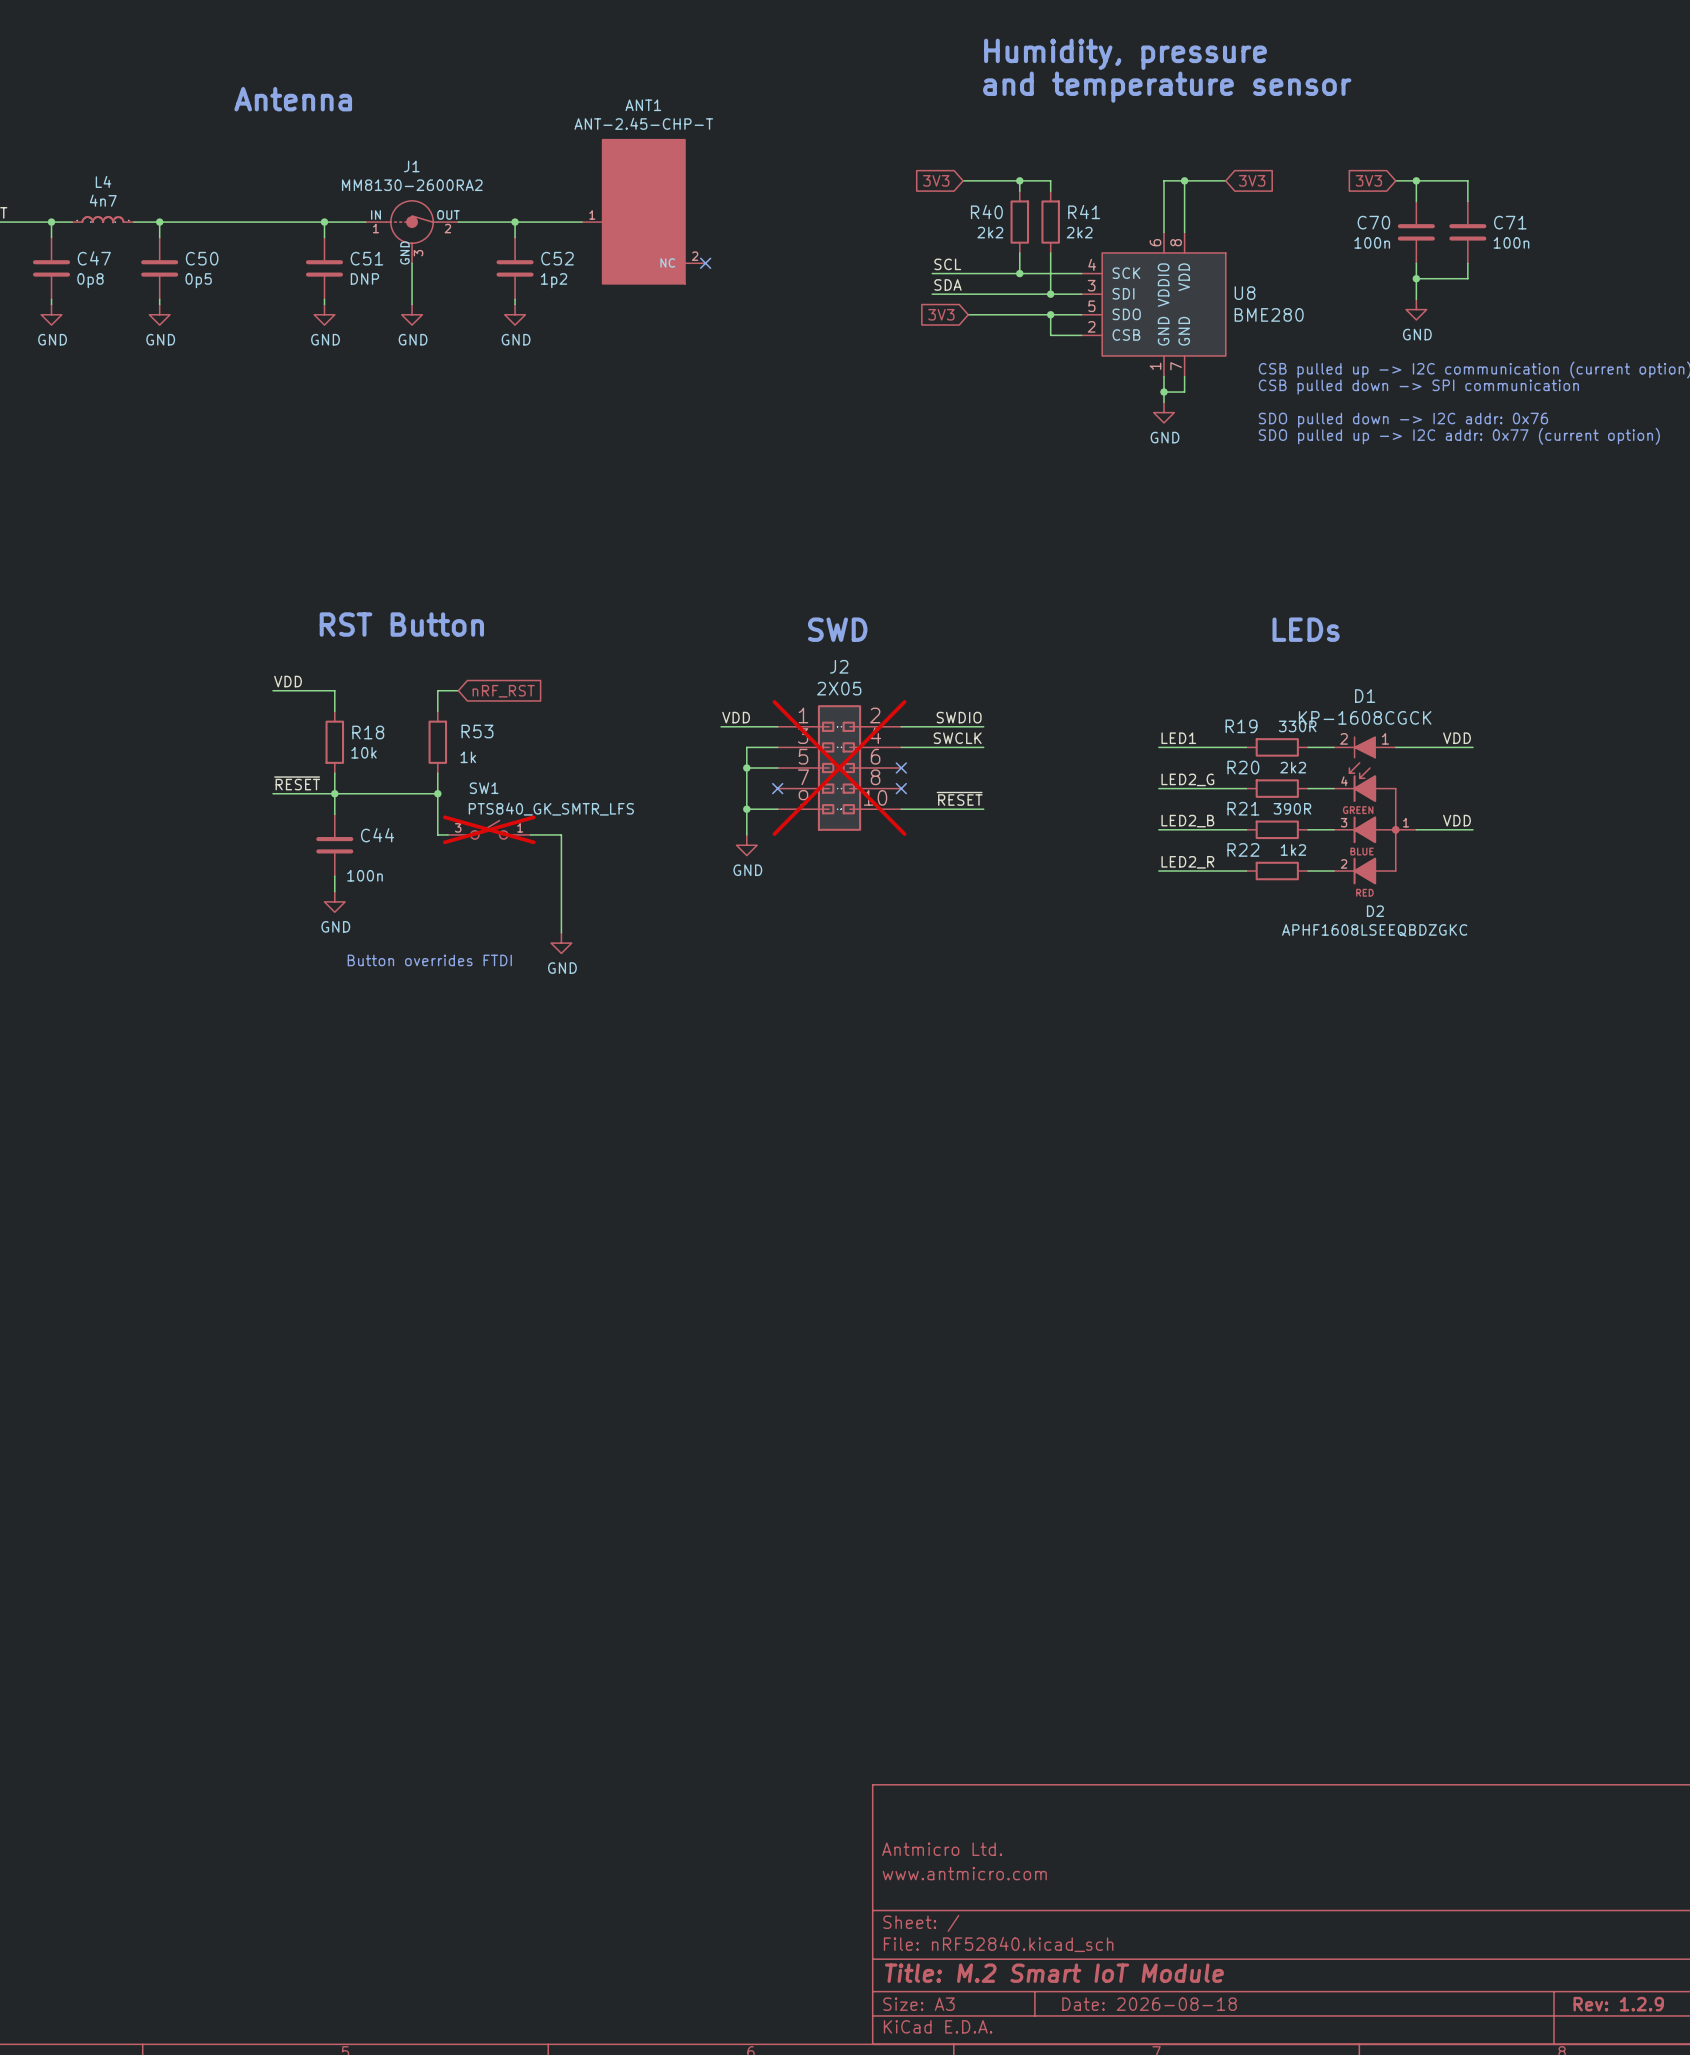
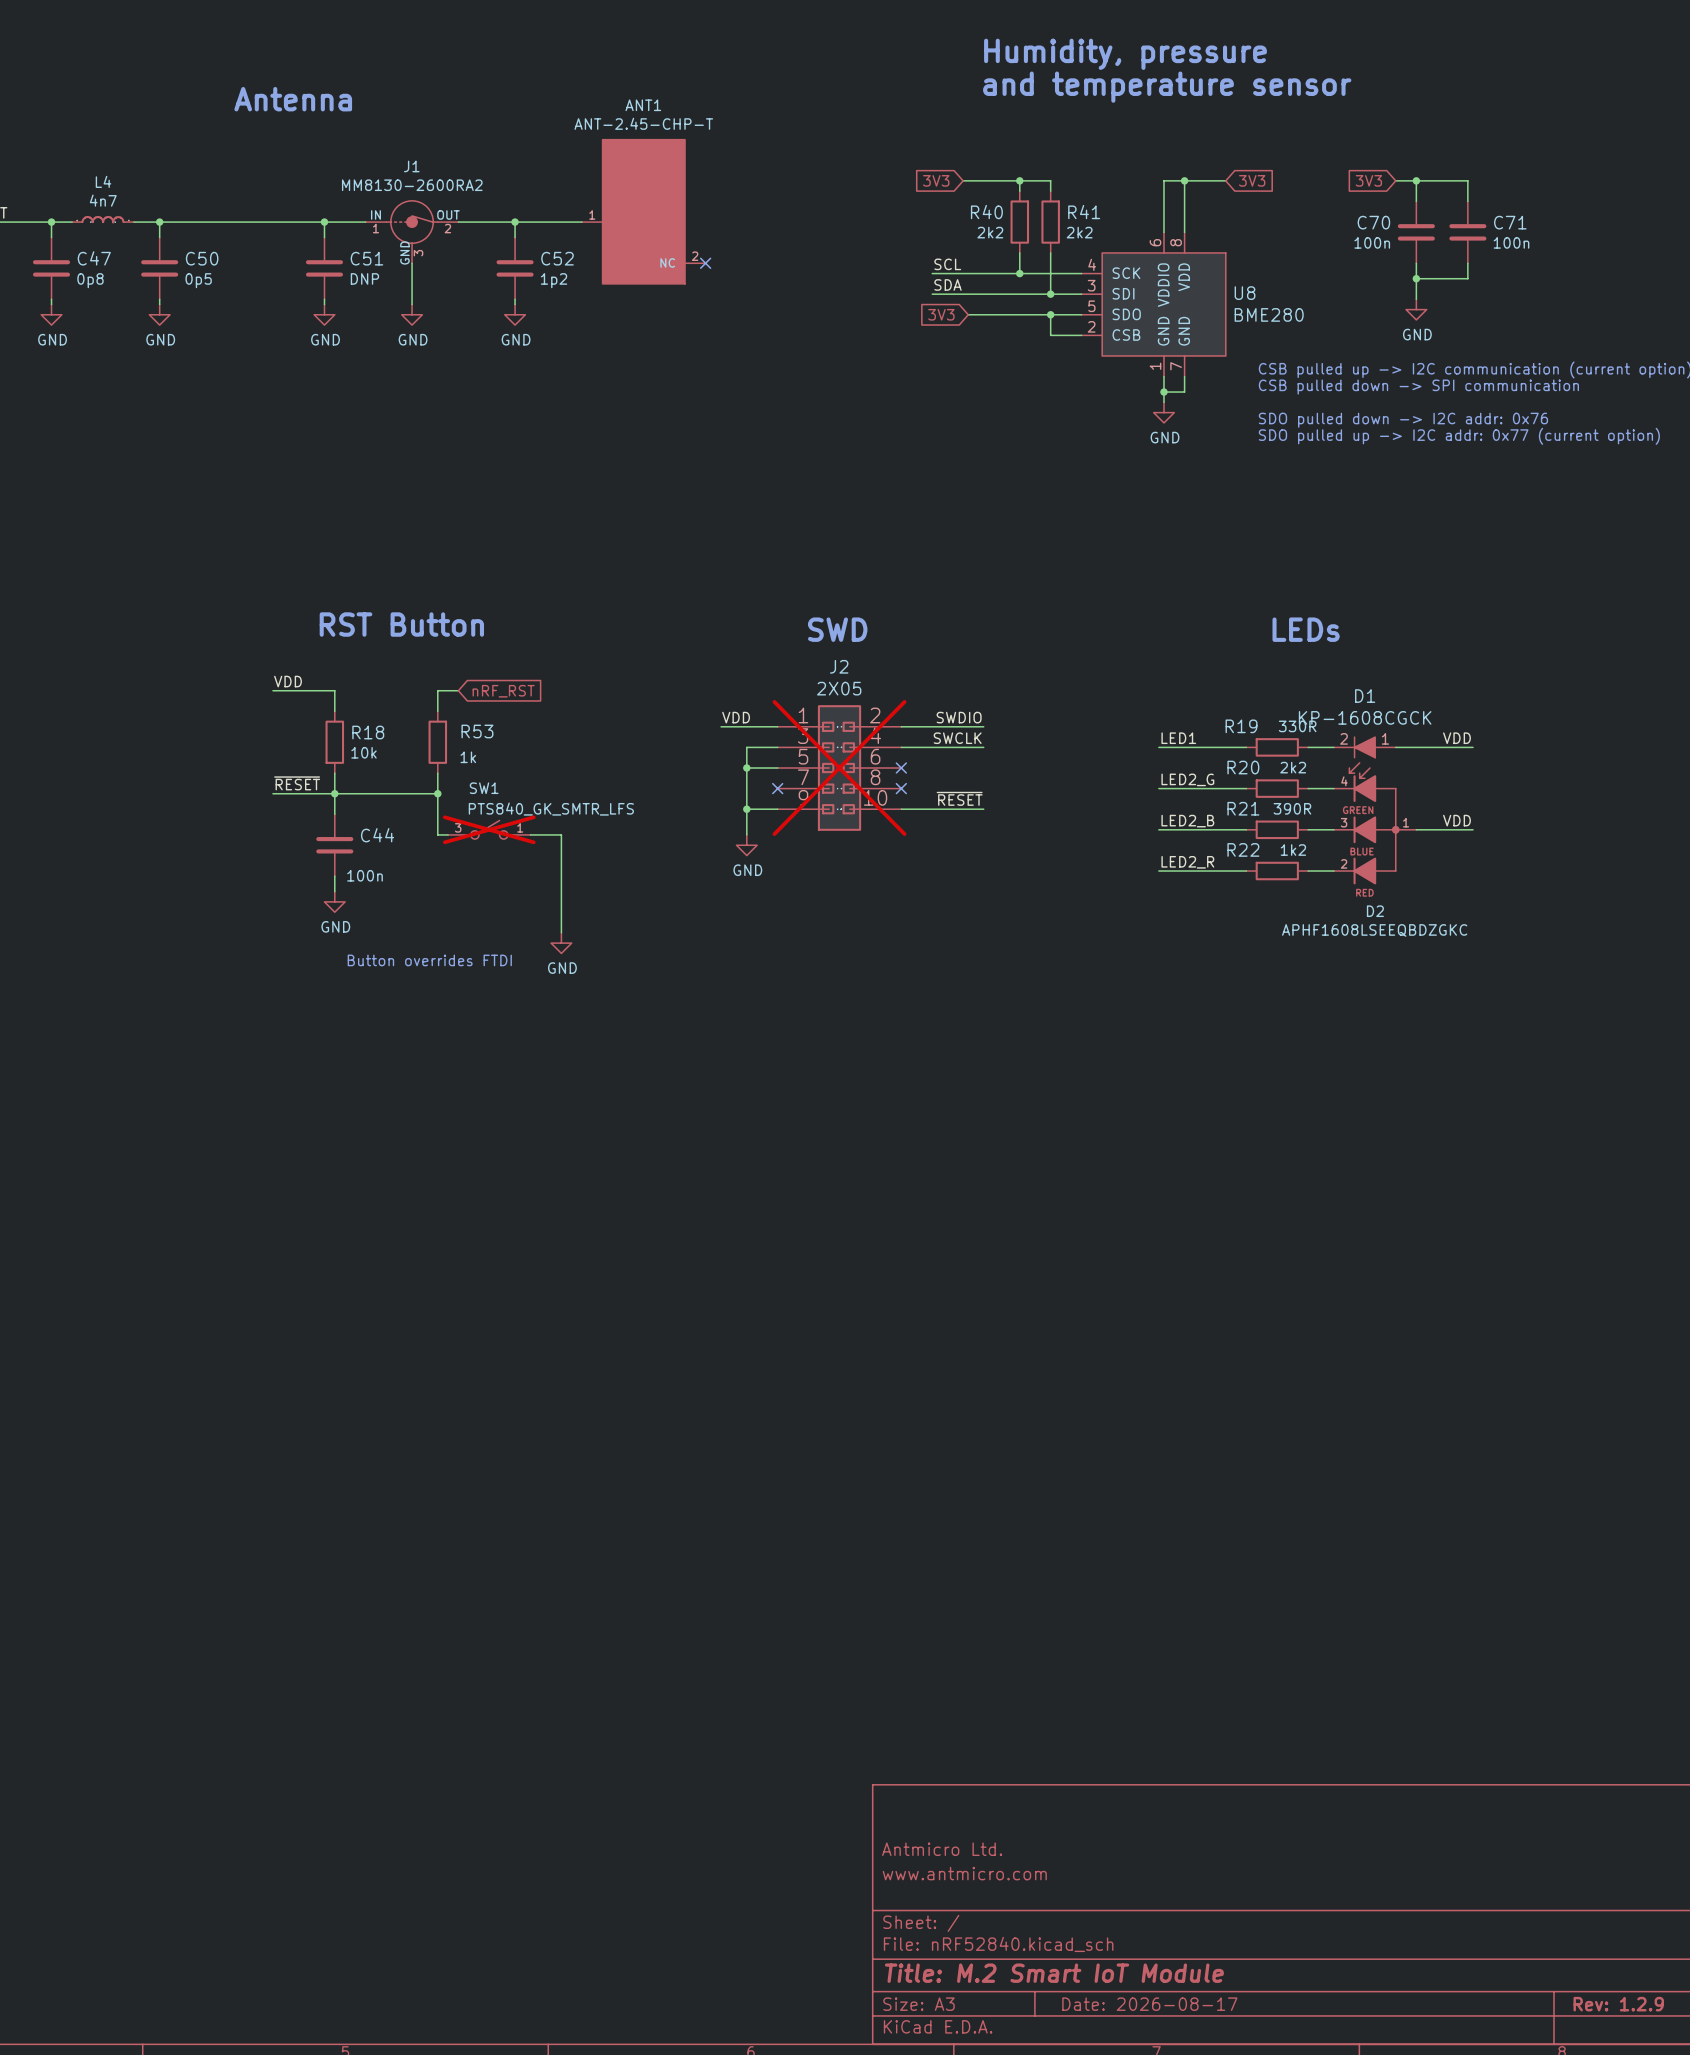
title block: Date: 2026-08-18 (1149, 2004) -> Date: 2026-08-17 (1149, 2004)

